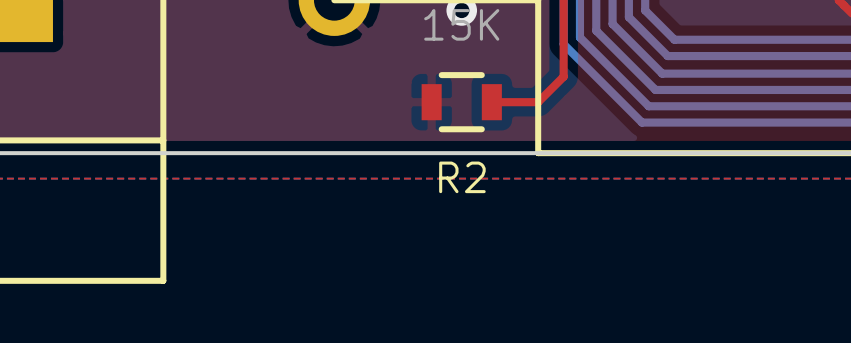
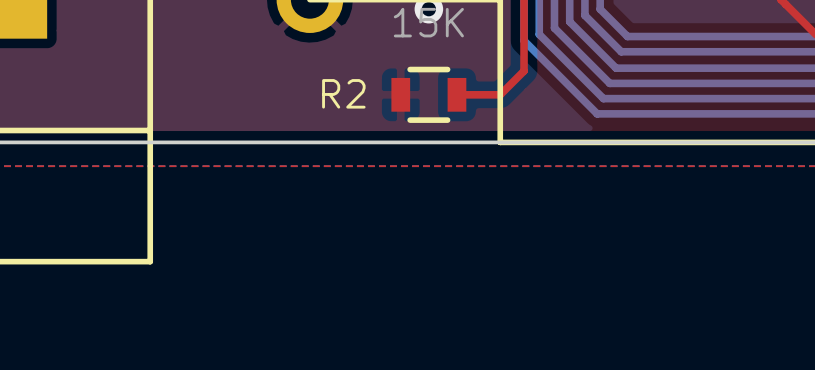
R2 name position: R2 (462, 177) -> R2 (343, 93)

